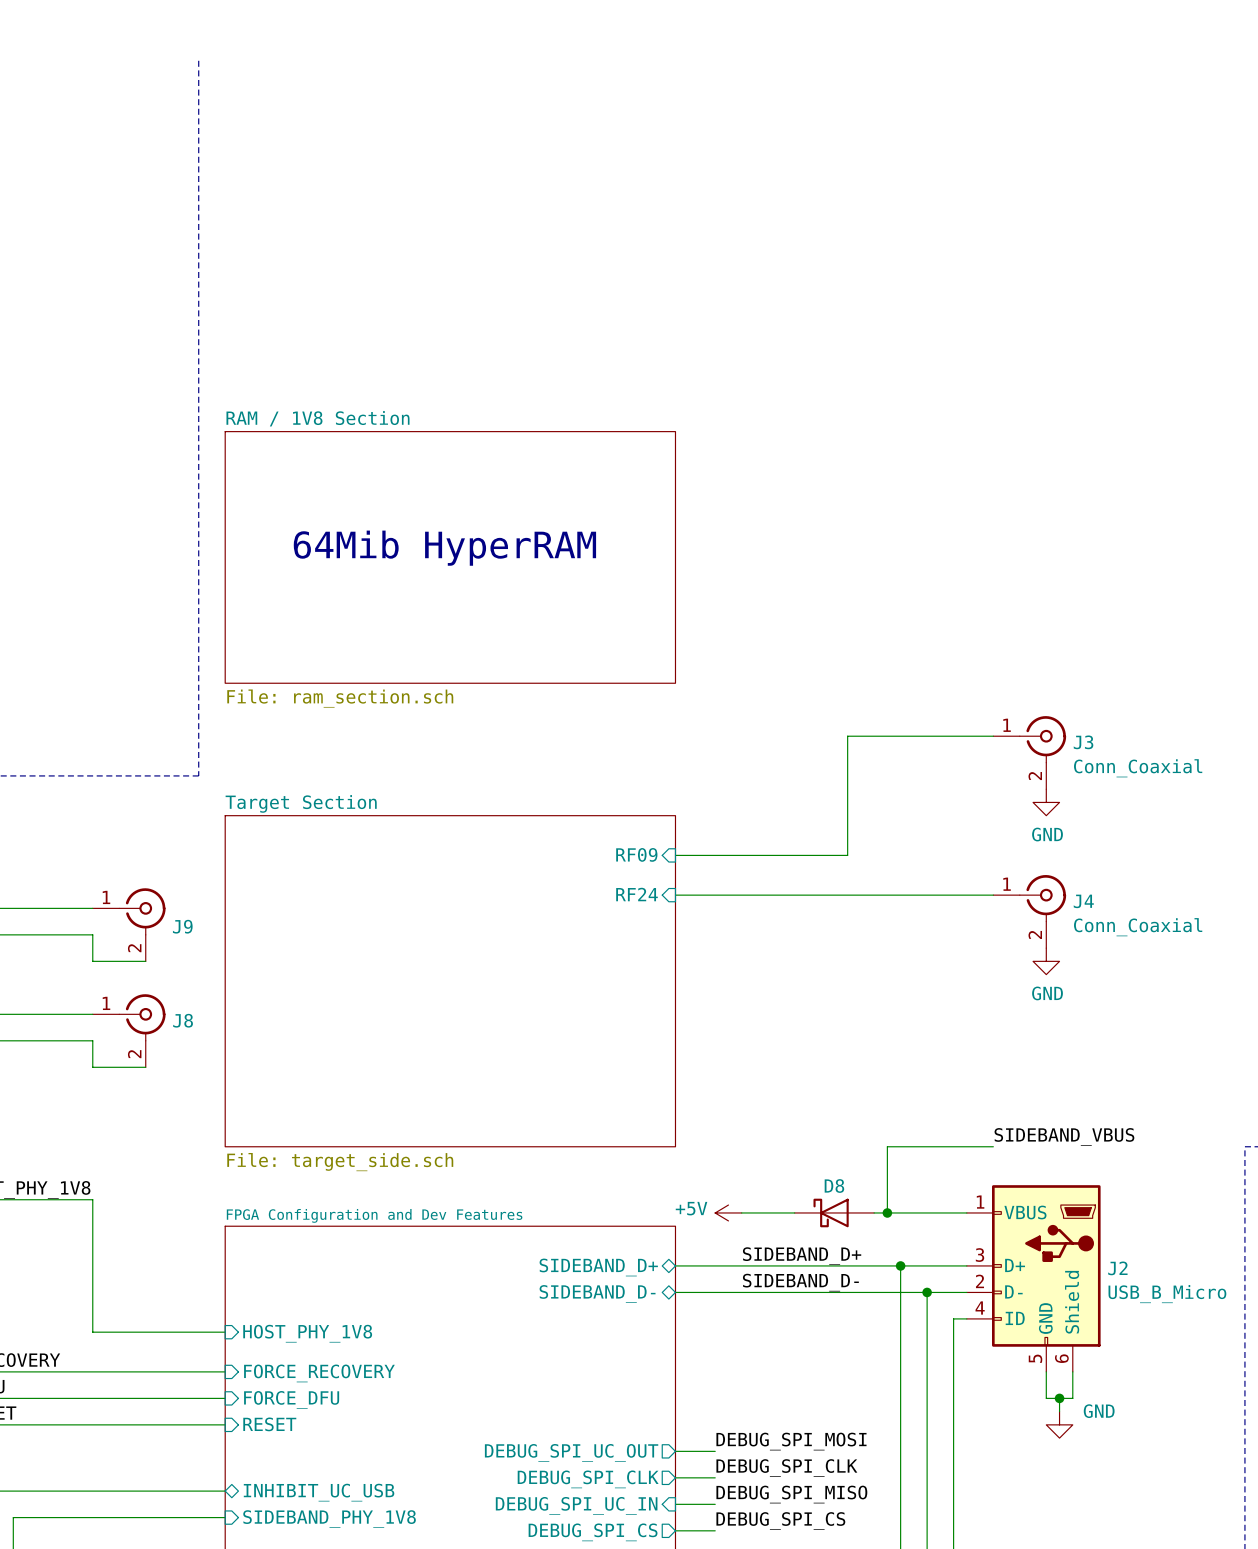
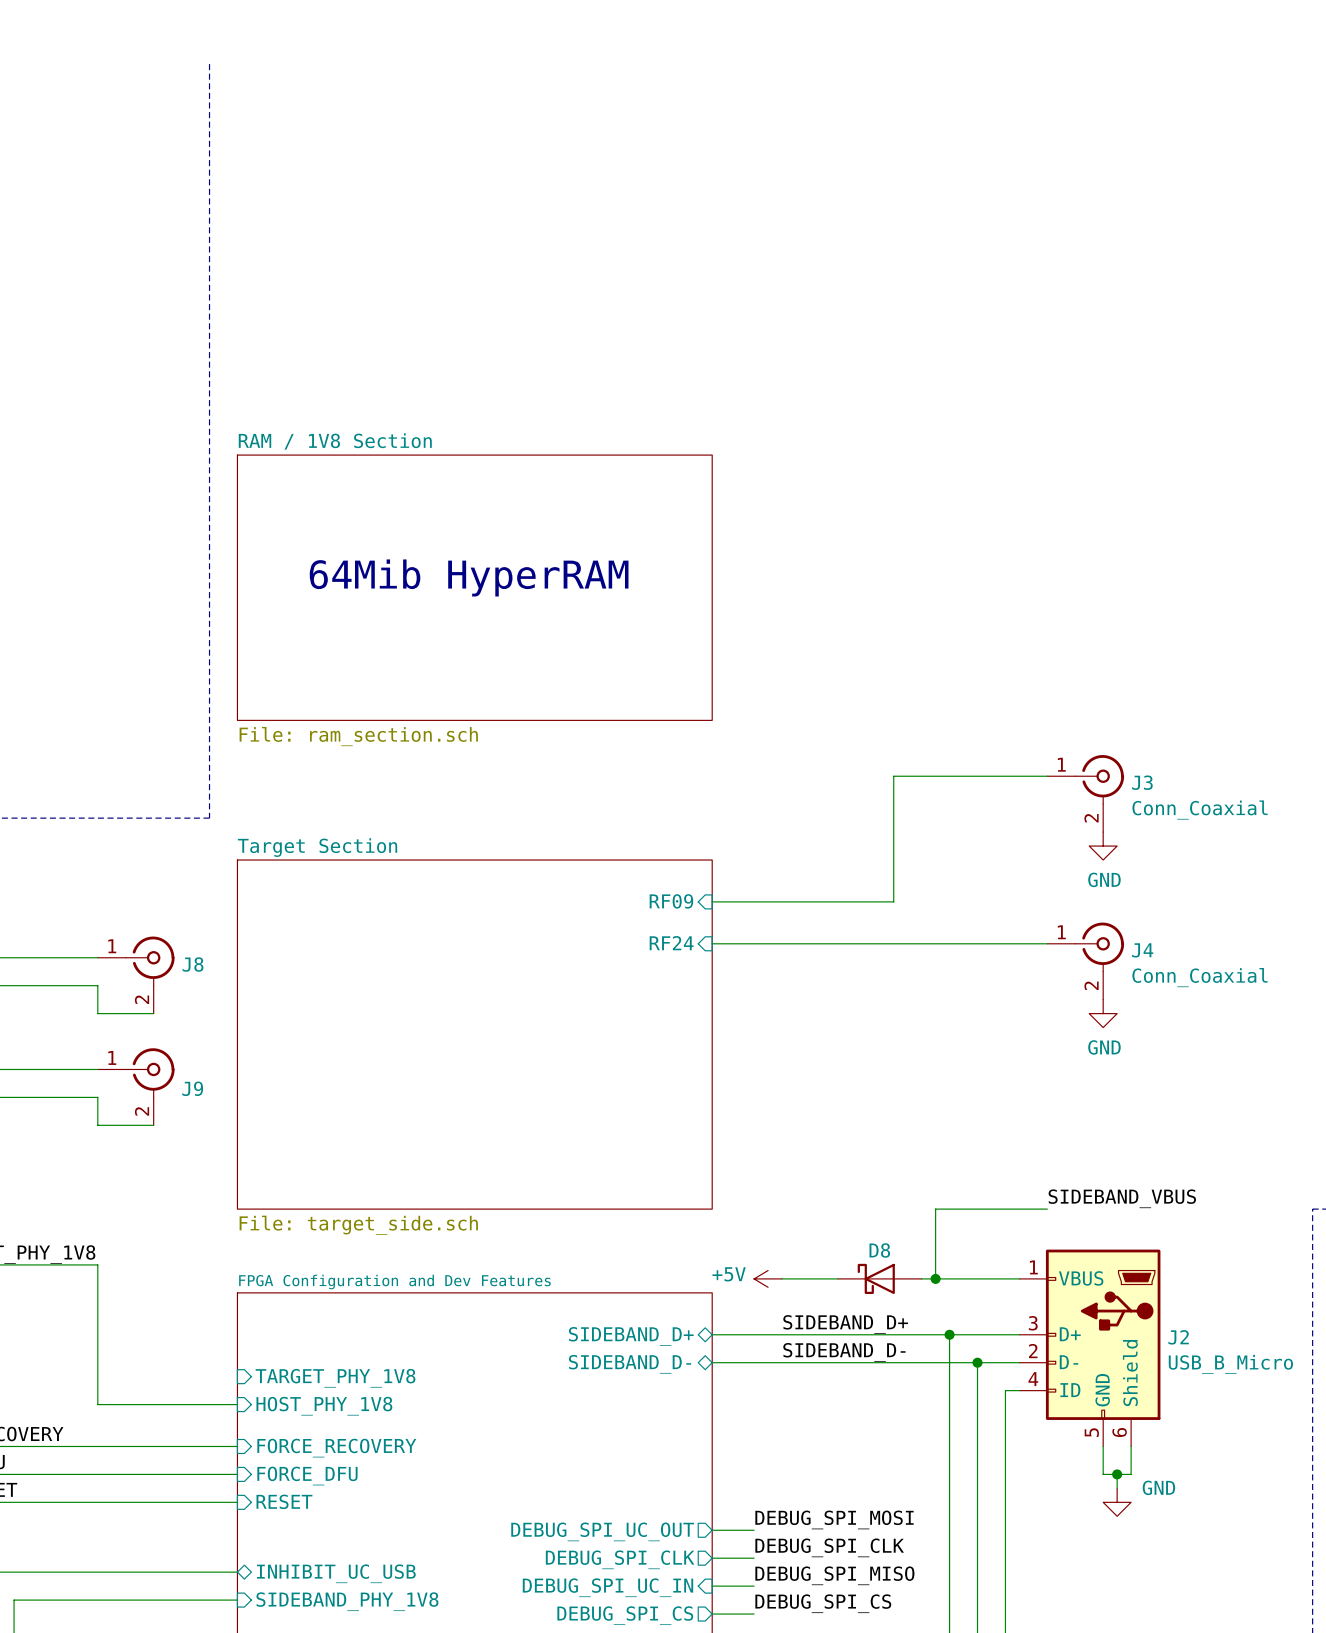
J9 name: J9 (182, 926) -> J8 (193, 964)
J8 name: J8 (183, 1020) -> J9 (192, 1088)
sheet pin: none -> TARGET_PHY_1V8 (335, 1378)

